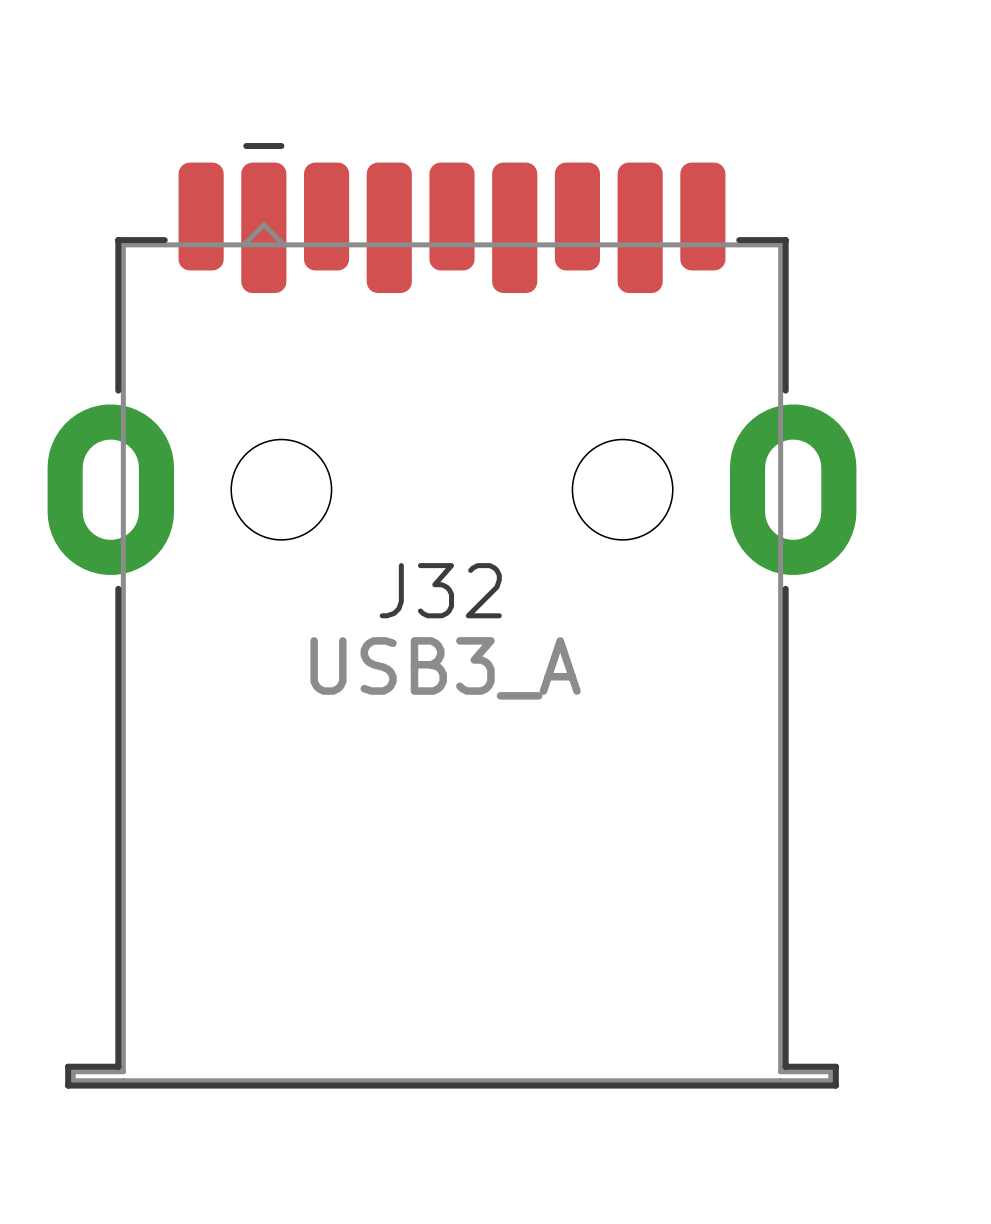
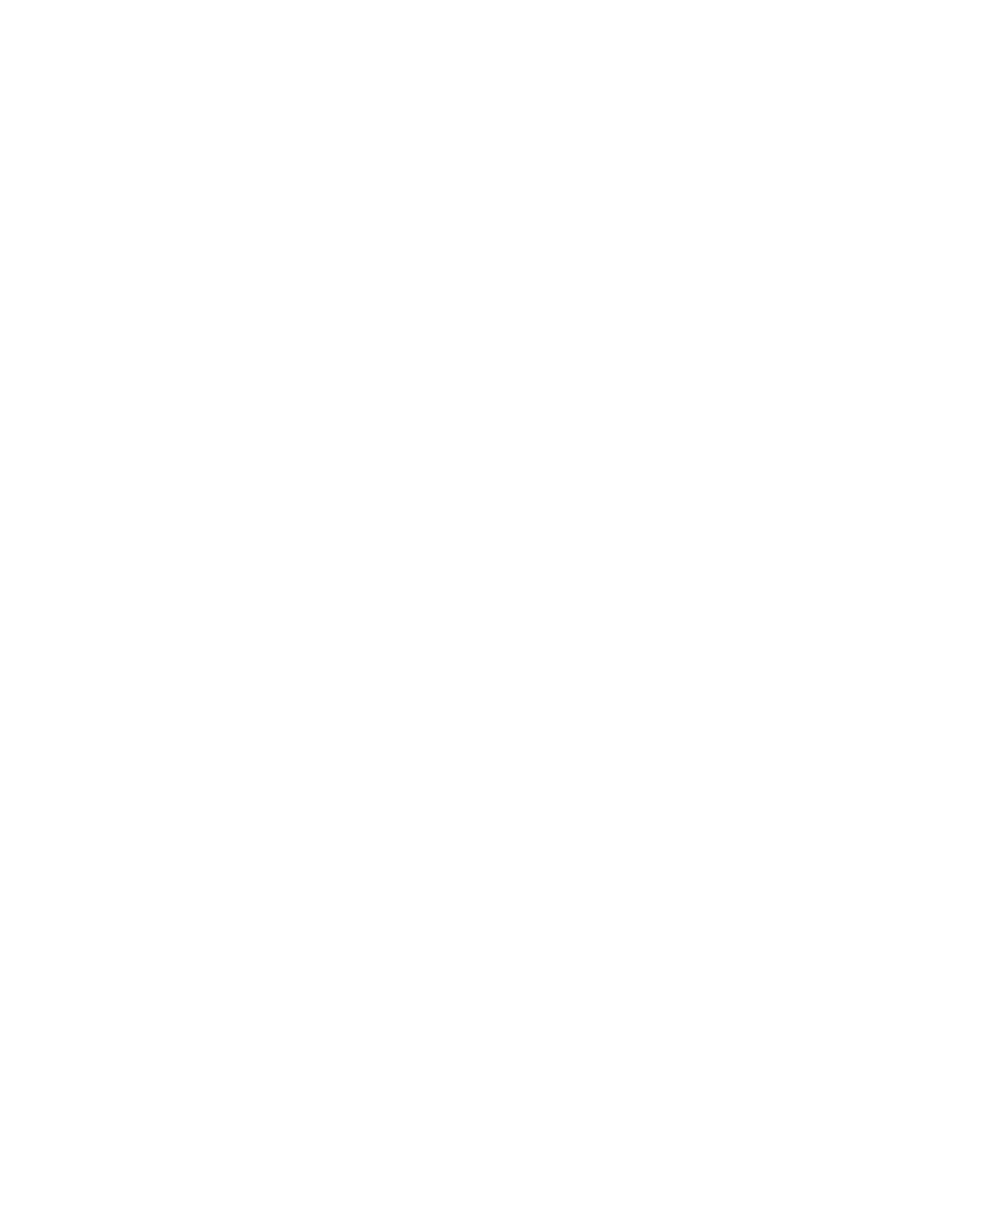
J32: USB3_A (452, 615) -> none

